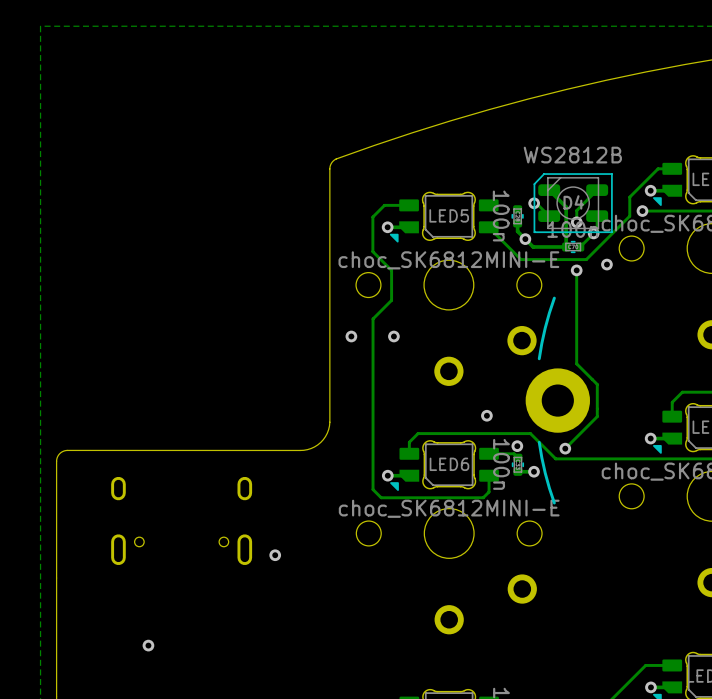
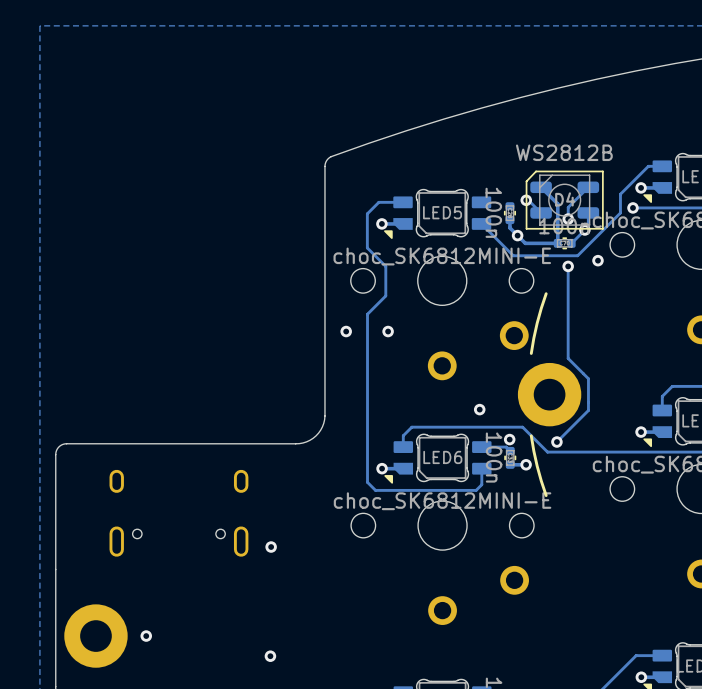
part: none -> (95, 636)
via: none -> (270, 656)

